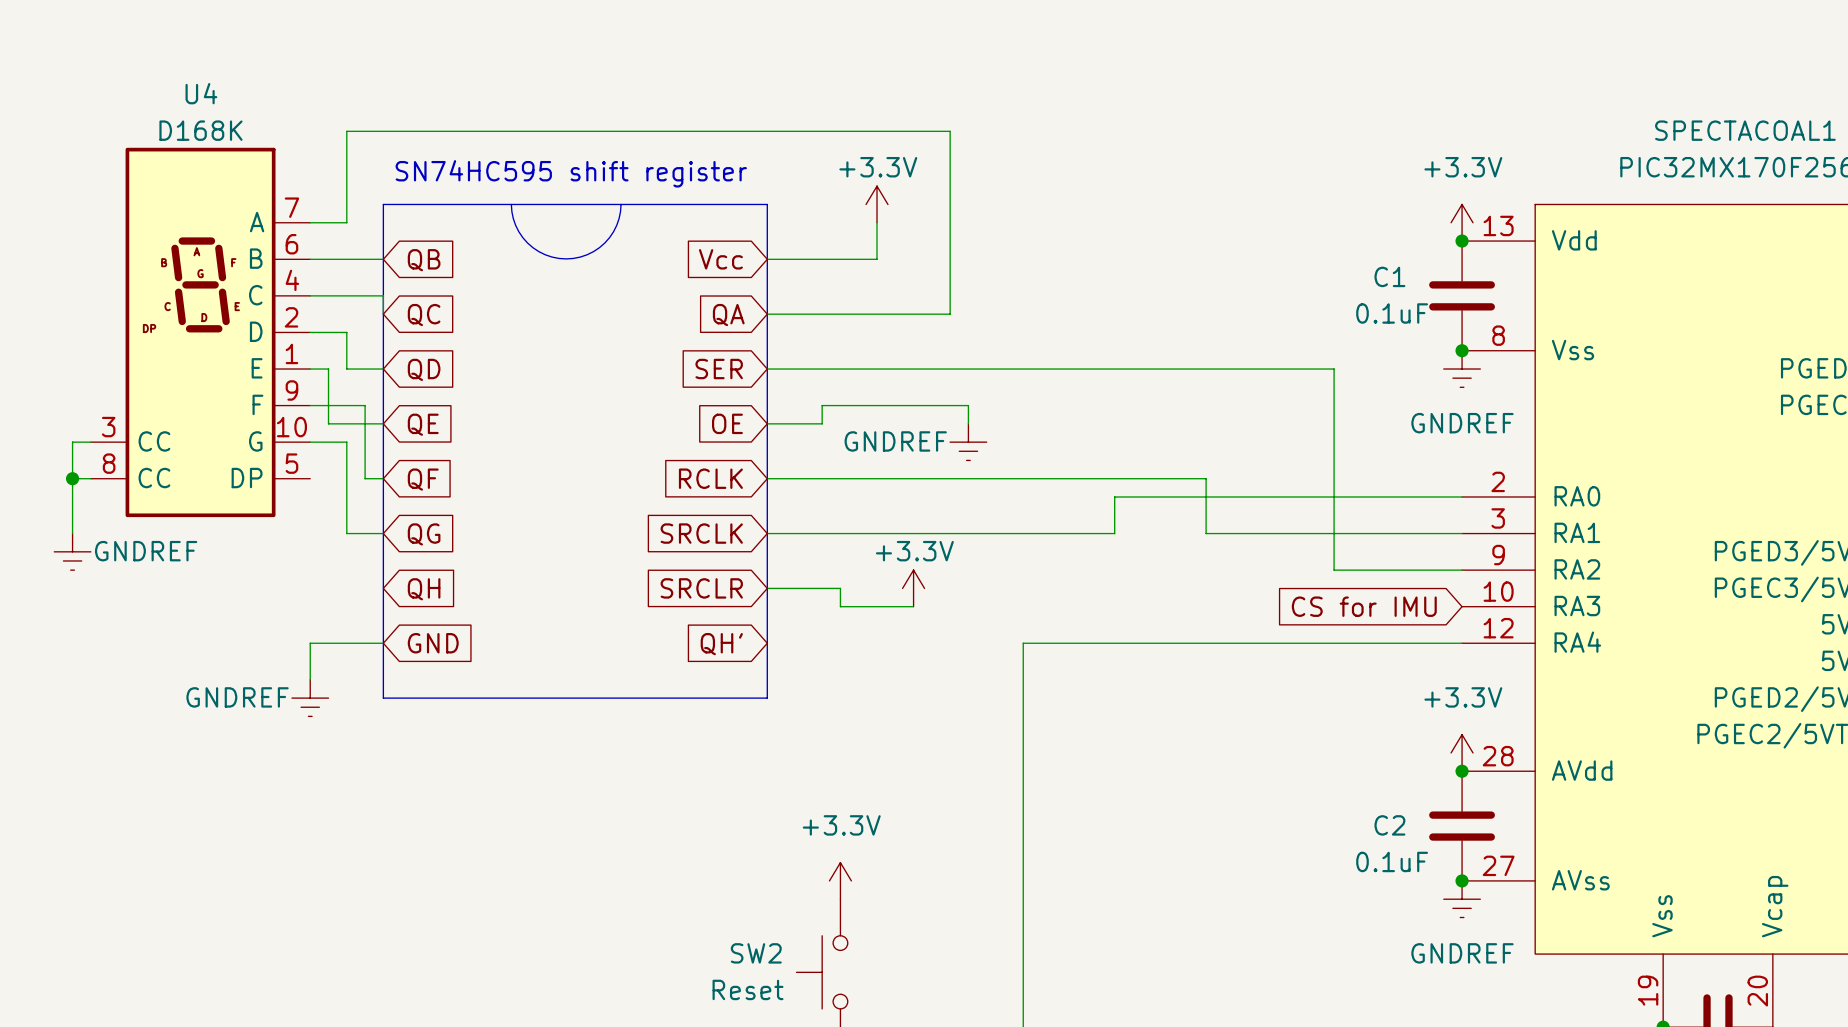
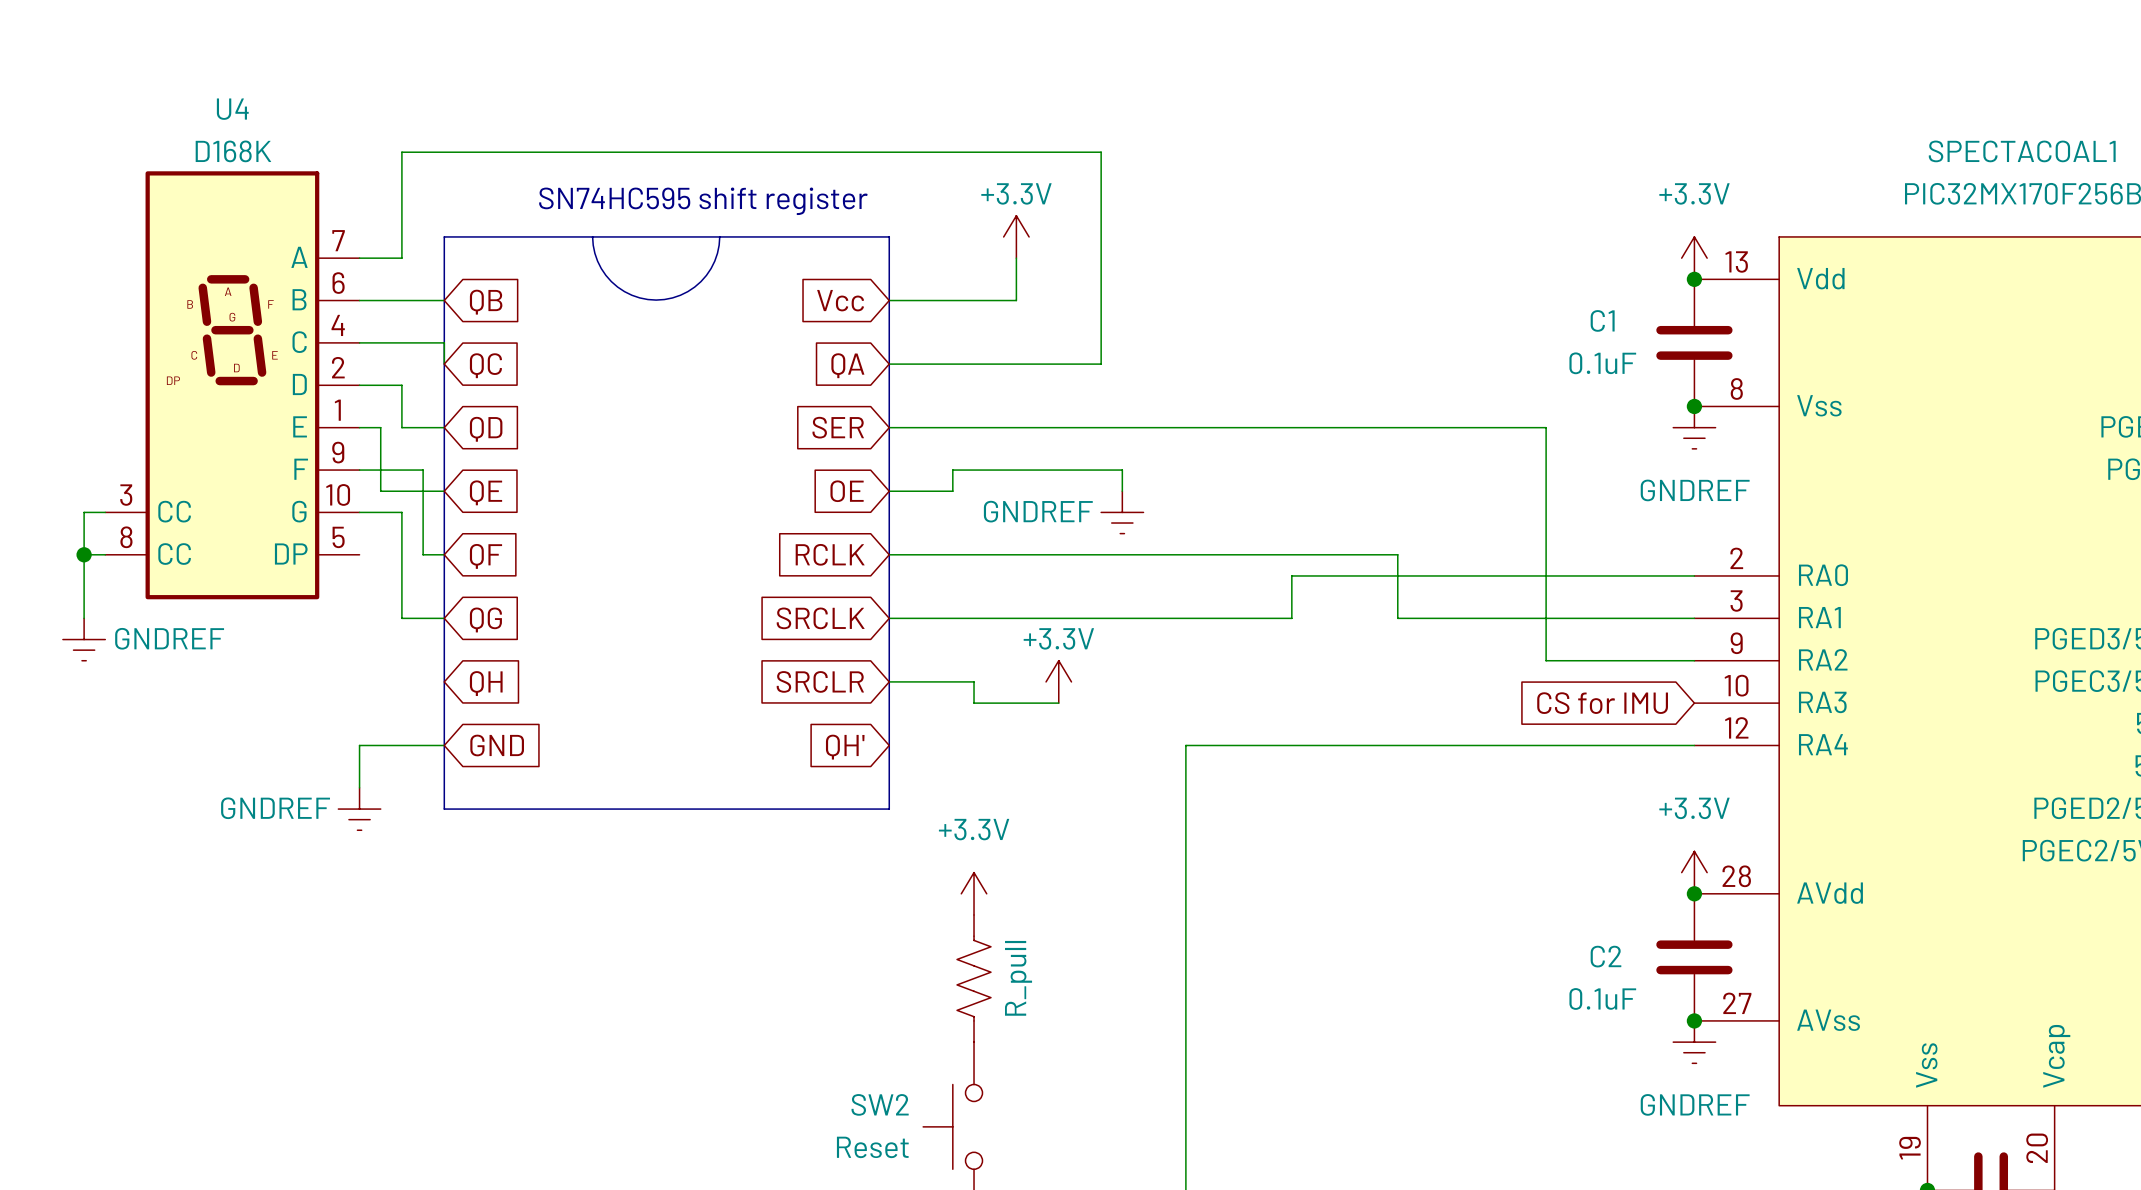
part: none -> R_pull (974, 978)
power symbol position: +3.3V (840, 880) -> +3.3V (974, 893)

